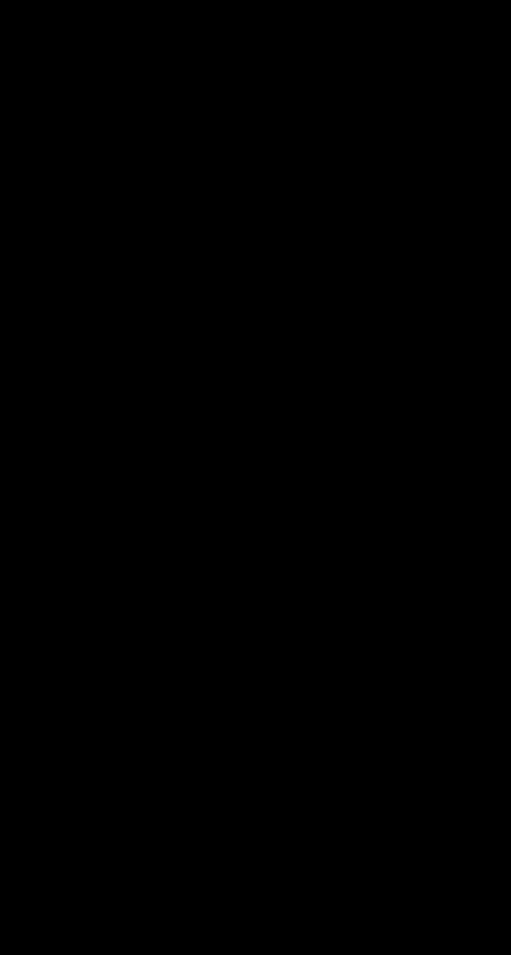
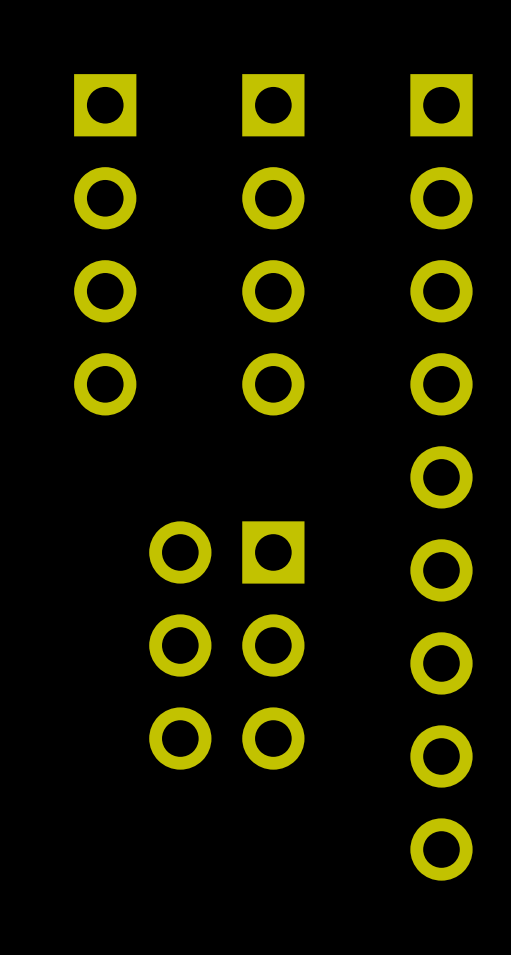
part: none -> (105, 244)
part: none -> (273, 244)
part: none -> (441, 477)
part: none -> (226, 645)

